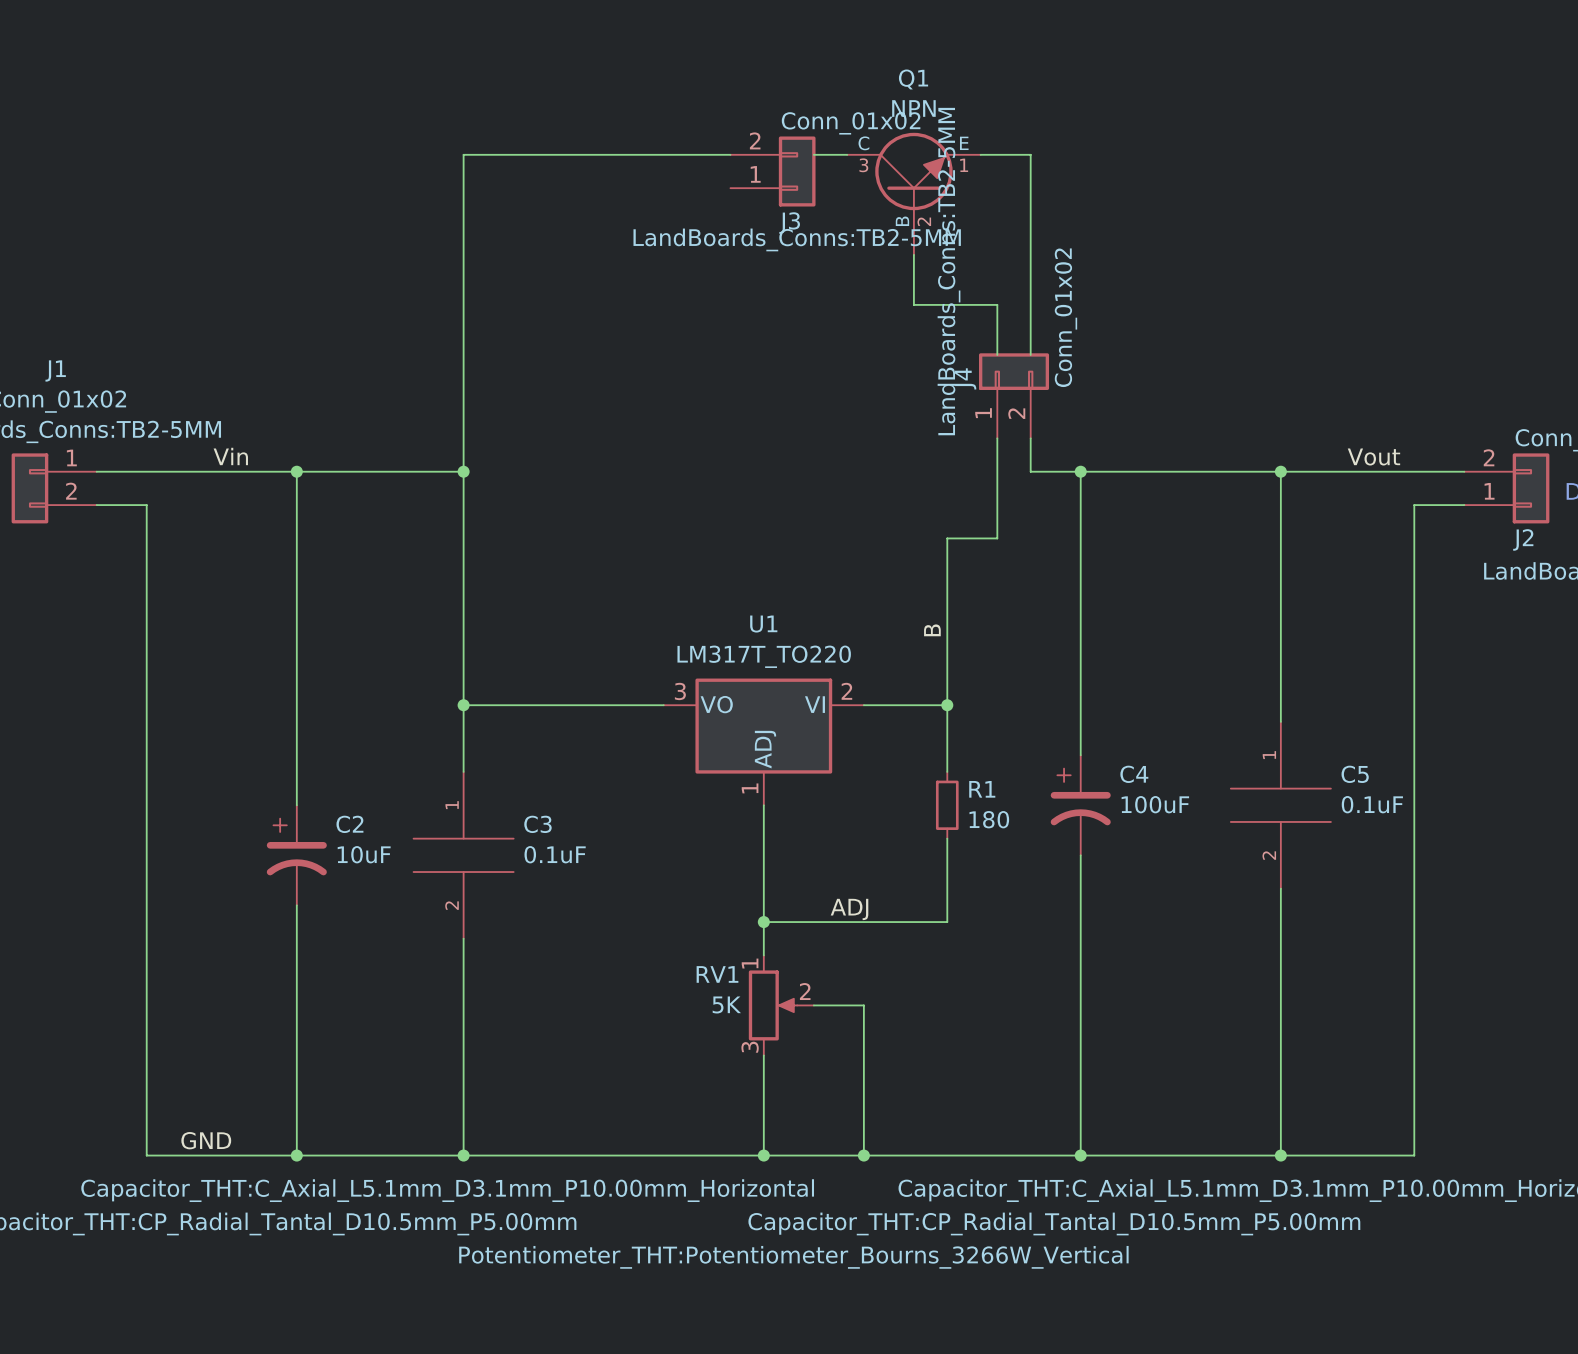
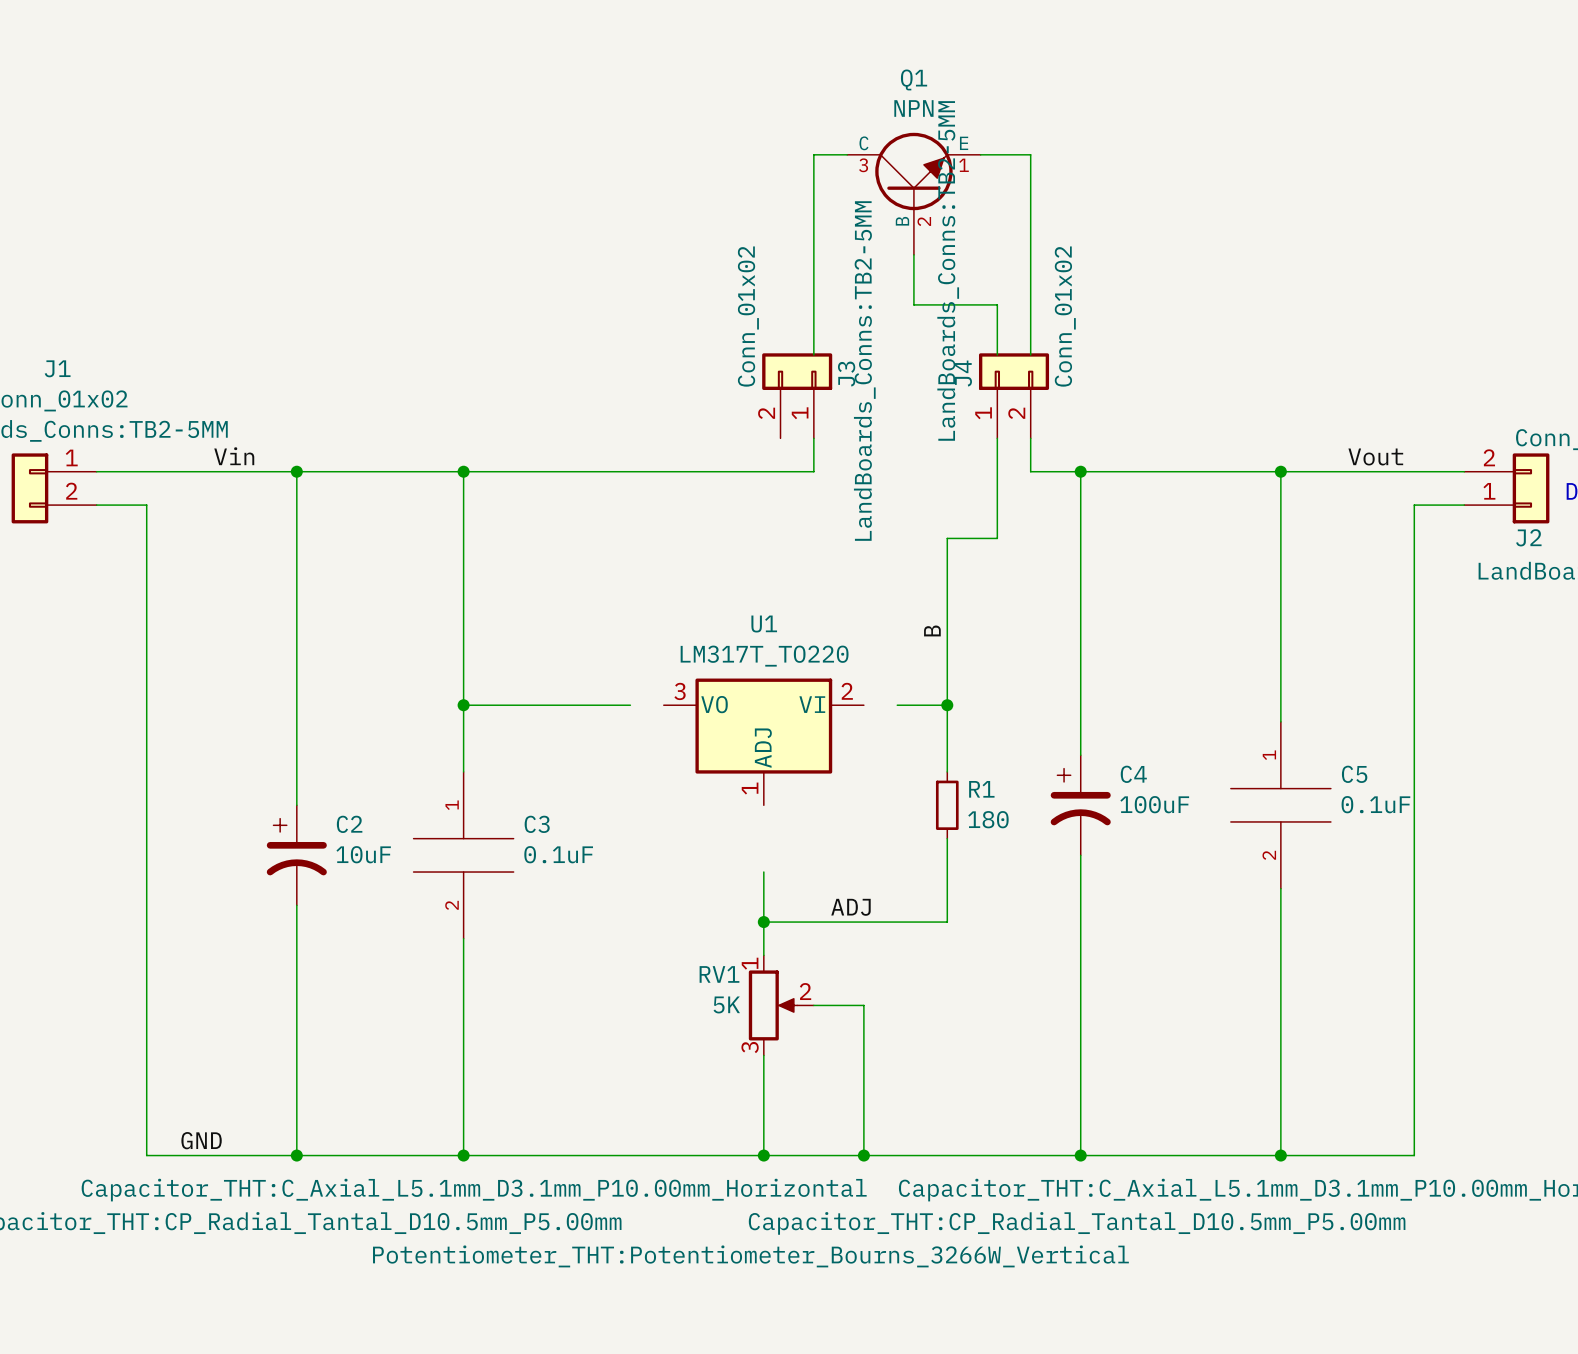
wire: (730, 154) (463, 154) (463, 471) -> (813, 438) (813, 471) (463, 471)
wire: none -> (813, 154) (813, 354)
J3 position: (773, 171) -> (797, 395)
J3 rotation: 0° (797, 171) -> 90° counterclockwise (797, 371)
wire: (630, 705) (663, 705) -> none
wire: (863, 705) (897, 705) -> none
wire: (763, 805) (763, 872) -> none

